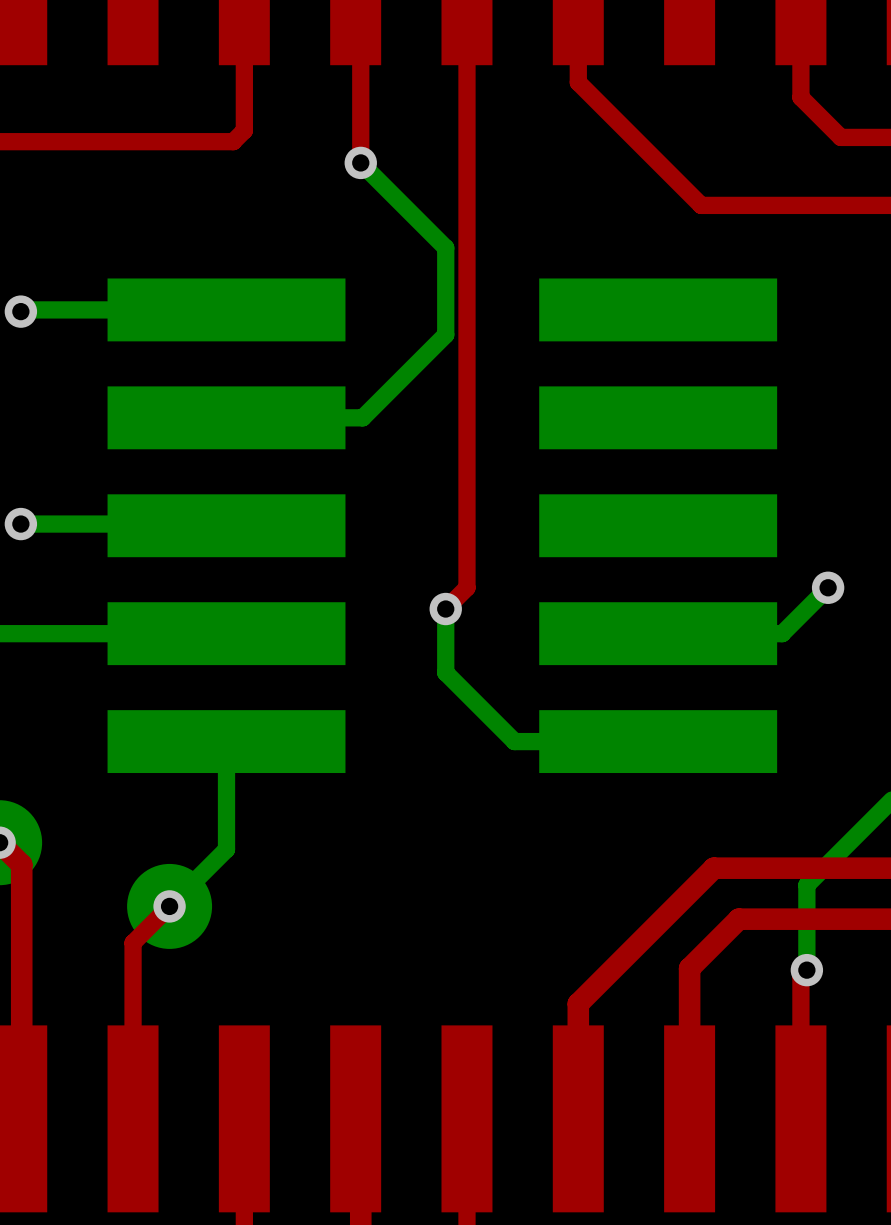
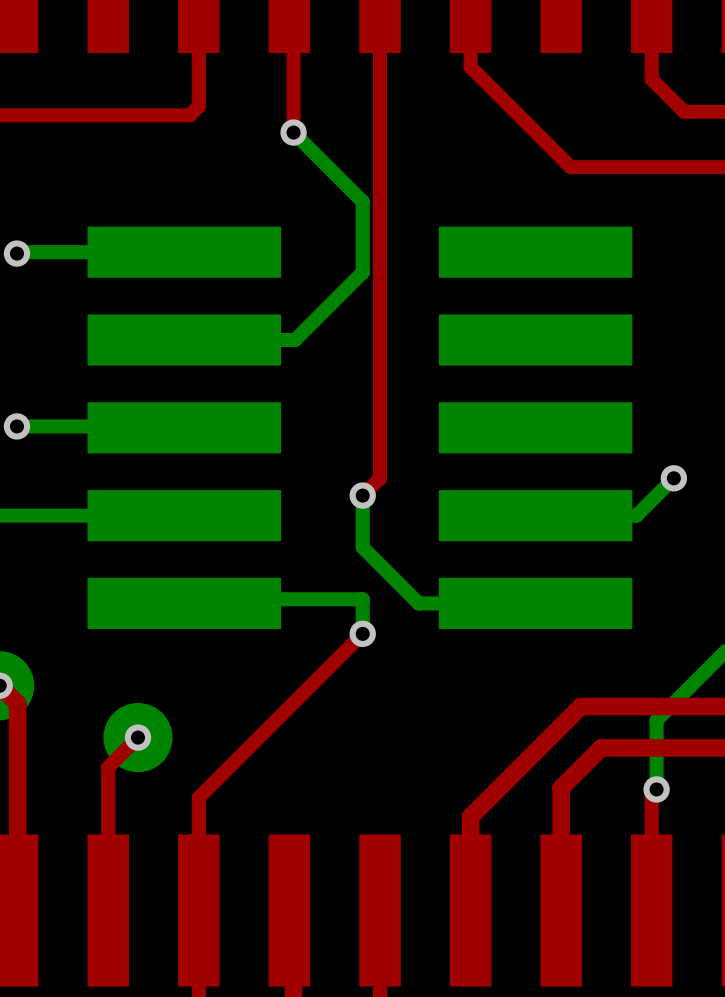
bottom track: (226, 741) (226, 849) (169, 906) -> (184, 603) (188, 599) (362, 599) (362, 633)
top track: none -> (362, 633) (198, 797) (198, 910)
via: none -> (362, 633)

